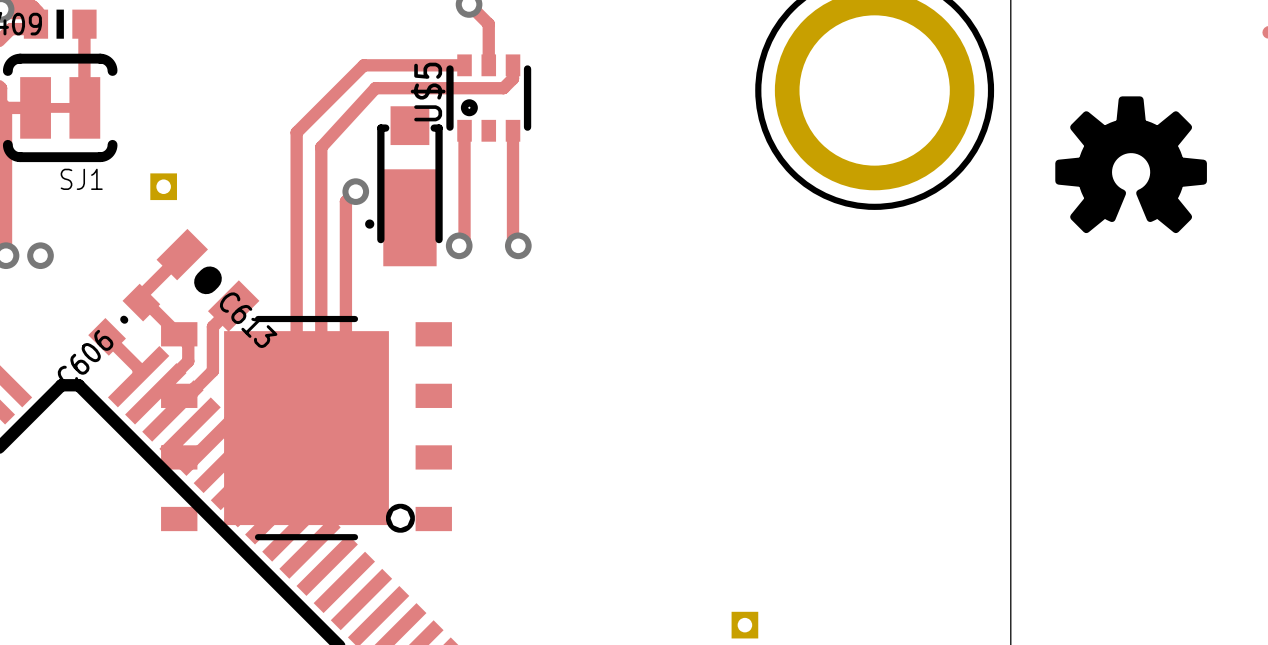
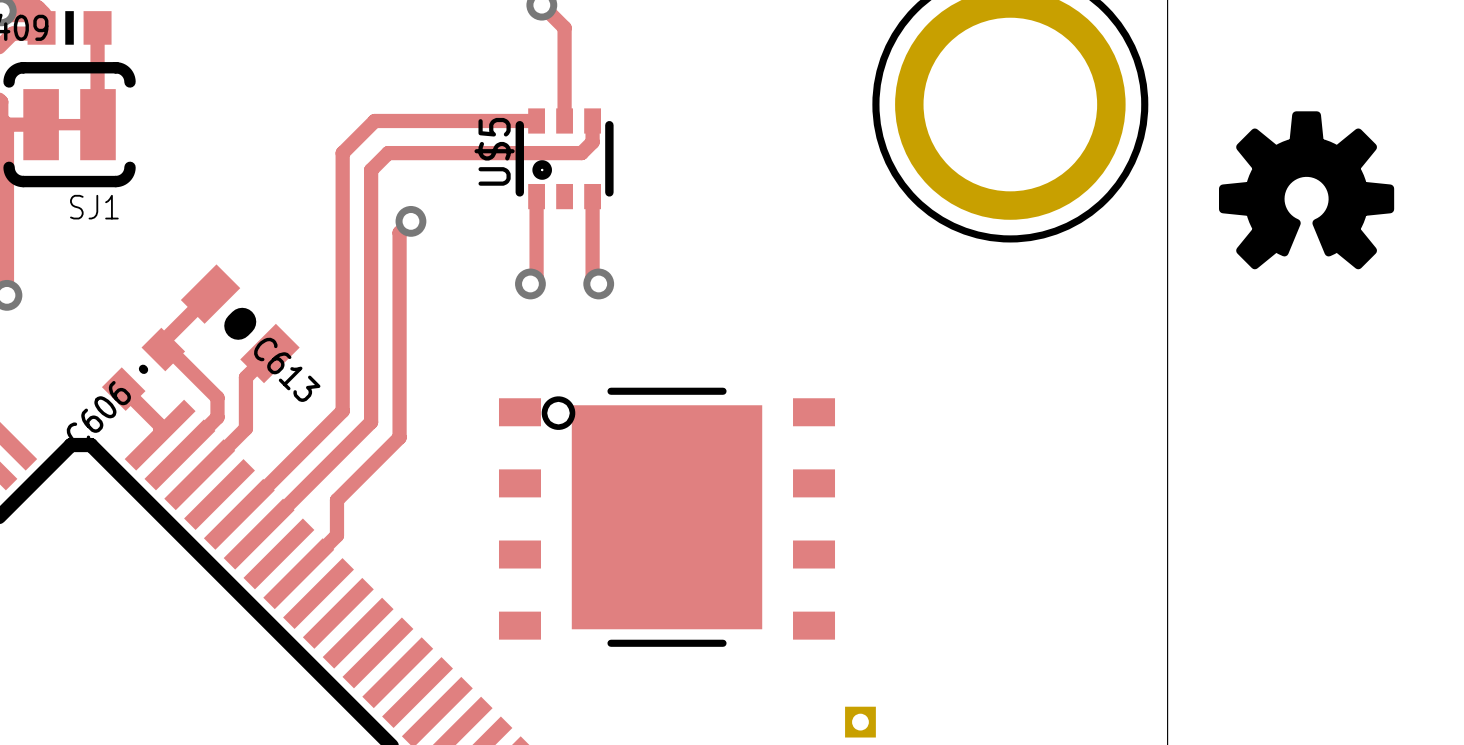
track: (464, 65) (363, 65) (324, 104) -> (536, 120) (374, 120)
track: (513, 65) (513, 78) (503, 88) (375, 88) (321, 147) -> (592, 120) (592, 142) (581, 153) (388, 153) (371, 170)
U$5 position: (488, 98) -> (564, 158)
track: (464, 130) (464, 170) -> (564, 75) (564, 120)
track: (513, 130) (513, 170) -> none
part: (163, 186) -> none
part: (403, 186) -> none
via: (40, 255) -> none
part rotation: 0° (306, 428) -> 180° (667, 517)
part position: (306, 428) -> (667, 517)

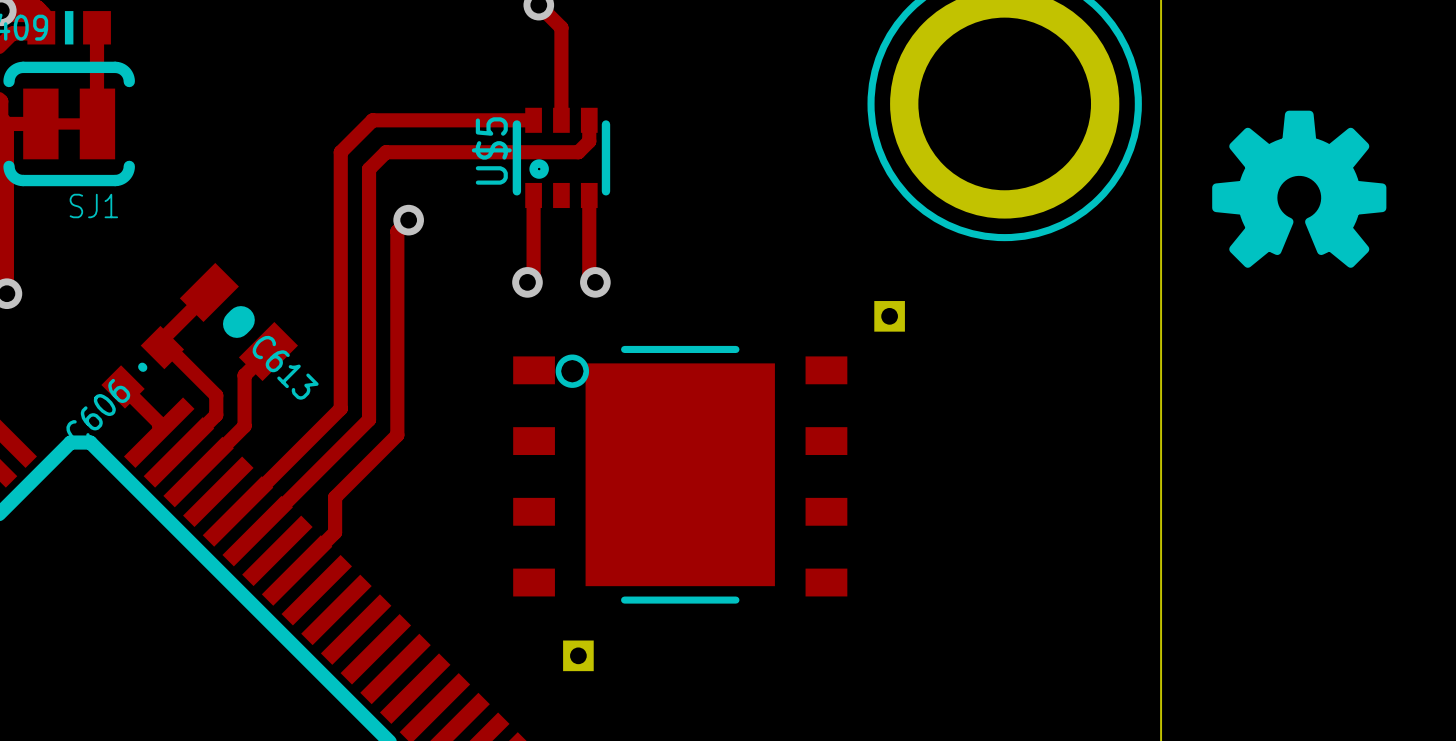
part: none -> (889, 316)
part position: (667, 517) -> (680, 474)
part: none -> (578, 655)
part: (860, 722) -> none

